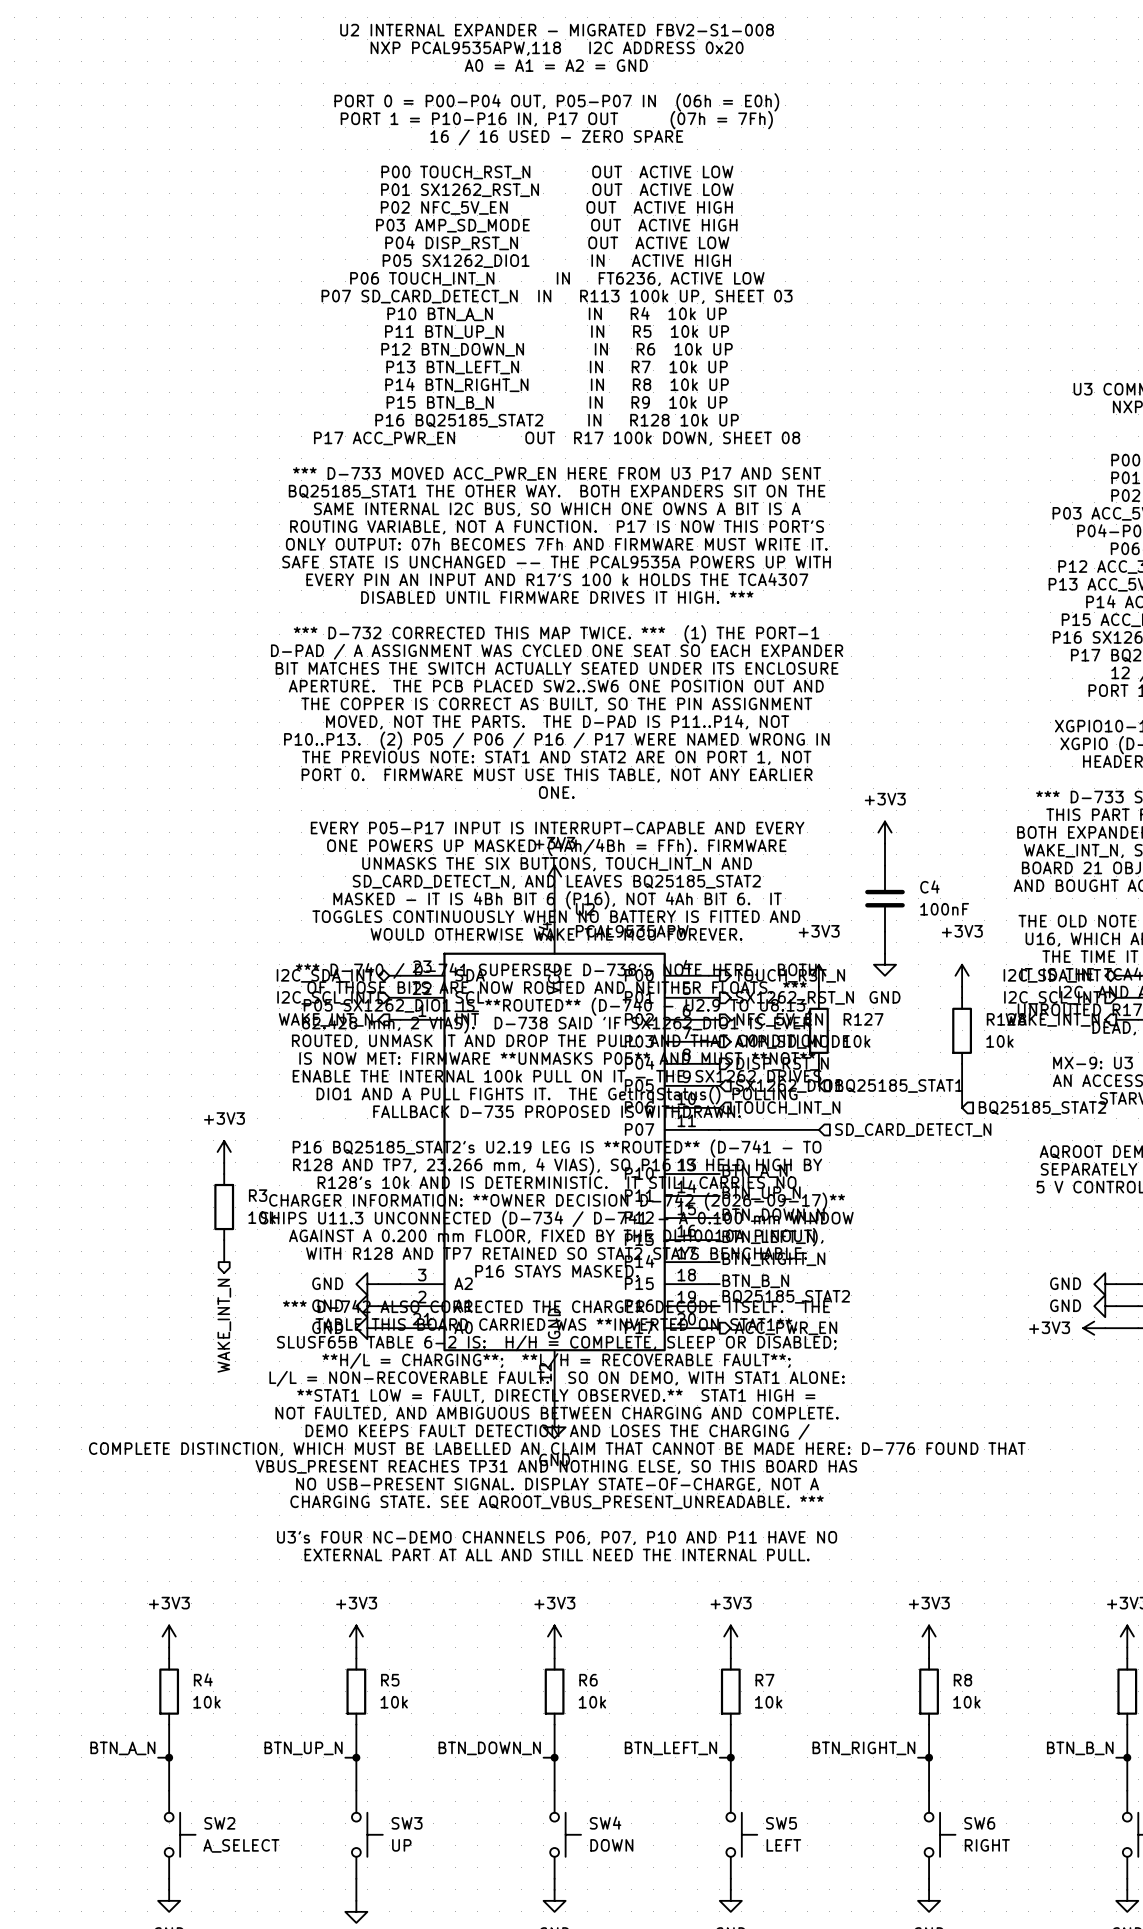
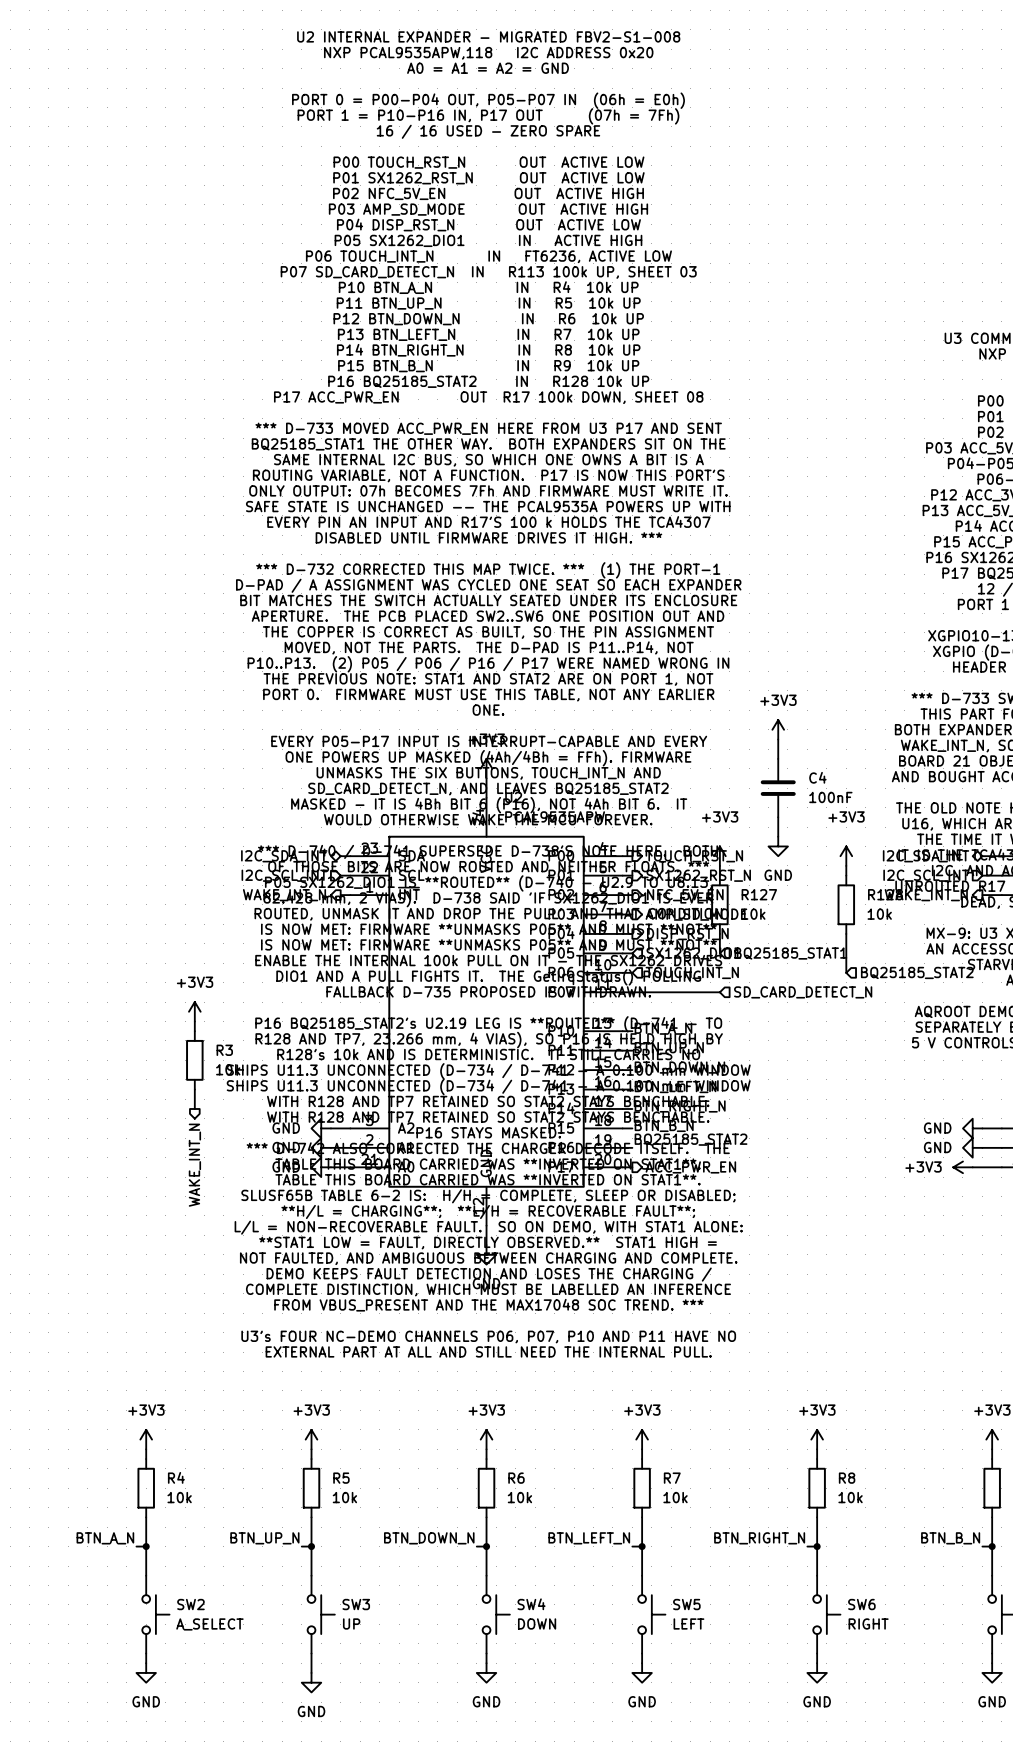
text: U2 INTERNAL EXPANDER - MIGRATED FBV2-S1-008 (557, 30) -> none
text: NXP PCAL9535APW,118 I2C ADDRESS 0x20 (557, 48) -> U2 INTERNAL EXPANDER - MIGRATED FBV2-S1-008 (488, 36)
text: A0 = A1 = A2 = GND (556, 65) -> NXP PCAL9535APW,118 I2C ADDRESS 0x20 (488, 53)
text: none -> A0 = A1 = A2 = GND (488, 68)
text: PORT 0 = P00-P04 OUT, P05-P07 IN (06h = E0h) (556, 102) -> none
text: PORT 1 = P10-P16 IN, P17 OUT (07h = 7Fh) (556, 120) -> PORT 0 = P00-P04 OUT, P05-P07 IN (06h = E0h) (488, 100)
text: 16 / 16 USED - ZERO SPARE (556, 137) -> PORT 1 = P10-P16 IN, P17 OUT (07h = 7Fh) (488, 116)
text: none -> 16 / 16 USED - ZERO SPARE (488, 131)
text: P00 TOUCH_RST_N OUT ACTIVE LOW (557, 172) -> none
text: P01 SX1262_RST_N OUT ACTIVE LOW (557, 190) -> P00 TOUCH_RST_N OUT ACTIVE LOW (488, 162)
text: P02 NFC_5V_EN OUT ACTIVE HIGH (556, 207) -> P01 SX1262_RST_N OUT ACTIVE LOW (488, 178)
text: P03 AMP_SD_MODE OUT ACTIVE HIGH (556, 225) -> P02 NFC_5V_EN OUT ACTIVE HIGH (488, 193)
text: P04 DISP_RST_N OUT ACTIVE LOW (557, 243) -> P03 AMP_SD_MODE OUT ACTIVE HIGH (488, 209)
text: P05 SX1262_DIO1 IN ACTIVE HIGH (556, 261) -> P04 DISP_RST_N OUT ACTIVE LOW (488, 225)
text: P06 TOUCH_INT_N IN FT6236, ACTIVE LOW (557, 279) -> P05 SX1262_DIO1 IN ACTIVE HIGH (488, 240)
text: P07 SD_CARD_DETECT_N IN R113 100k UP, SHEET 03 (557, 296) -> P06 TOUCH_INT_N IN FT6236, ACTIVE LOW (488, 256)
text: P10 BTN_A_N IN R4 10k UP (557, 314) -> P07 SD_CARD_DETECT_N IN R113 100k UP, SHEET 03 (488, 272)
text: P11 BTN_UP_N IN R5 10k UP (557, 332) -> P10 BTN_A_N IN R4 10k UP (488, 287)
text: P12 BTN_DOWN_N IN R6 10k UP (557, 349) -> P11 BTN_UP_N IN R5 10k UP (488, 303)
text: P13 BTN_LEFT_N IN R7 10k UP (557, 367) -> P12 BTN_DOWN_N IN R6 10k UP (488, 319)
text: P14 BTN_RIGHT_N IN R8 10k UP (557, 385) -> P13 BTN_LEFT_N IN R7 10k UP (488, 334)
text: P15 BTN_B_N IN R9 10k UP (557, 403) -> P14 BTN_RIGHT_N IN R8 10k UP (488, 350)
text: P16 BQ25185_STAT2 IN R128 10k UP (557, 420) -> P15 BTN_B_N IN R9 10k UP (488, 366)
text: P17 ACC_PWR_EN OUT R17 100k DOWN, SHEET 08 (557, 438) -> P16 BQ25185_STAT2 IN R128 10k UP (488, 381)
text: none -> P17 ACC_PWR_EN OUT R17 100k DOWN, SHEET 08 (488, 397)
text: *** D-733 MOVED ACC_PWR_EN HERE FROM U3 P17 AND SENT (557, 473) -> none
text: BQ25185_STAT1 THE OTHER WAY. BOTH EXPANDERS SIT ON THE (557, 491) -> *** D-733 MOVED ACC_PWR_EN HERE FROM U3 P17 AND SENT (488, 428)
text: SAME INTERNAL I2C BUS, SO WHICH ONE OWNS A BIT IS A (557, 509) -> BQ25185_STAT1 THE OTHER WAY. BOTH EXPANDERS SIT ON THE (488, 444)
text: ROUTING VARIABLE, NOT A FUNCTION. P17 IS NOW THIS PORT'S (557, 527) -> SAME INTERNAL I2C BUS, SO WHICH ONE OWNS A BIT IS A (488, 460)
text: ONLY OUTPUT: 07h BECOMES 7Fh AND FIRMWARE MUST WRITE IT. (556, 544) -> ROUTING VARIABLE, NOT A FUNCTION. P17 IS NOW THIS PORT'S (488, 475)
text: SAFE STATE IS UNCHANGED -- THE PCAL9535A POWERS UP WITH (556, 562) -> ONLY OUTPUT: 07h BECOMES 7Fh AND FIRMWARE MUST WRITE IT. (488, 490)
text: EVERY PIN AN INPUT AND R17'S 100 k HOLDS THE TCA4307 (557, 579) -> SAFE STATE IS UNCHANGED -- THE PCAL9535A POWERS UP WITH (488, 506)
text: DISABLED UNTIL FIRMWARE DRIVES IT HIGH. *** (557, 597) -> EVERY PIN AN INPUT AND R17'S 100 k HOLDS THE TCA4307 (488, 522)
text: none -> DISABLED UNTIL FIRMWARE DRIVES IT HIGH. *** (488, 537)
text: *** D-732 CORRECTED THIS MAP TWICE. *** (1) THE PORT-1 (556, 634) -> none
text: D-PAD / A ASSIGNMENT WAS CYCLED ONE SEAT SO EACH EXPANDER (557, 651) -> *** D-732 CORRECTED THIS MAP TWICE. *** (1) THE PORT-1 (488, 570)
text: BIT MATCHES THE SWITCH ACTUALLY SEATED UNDER ITS ENCLOSURE (557, 668) -> D-PAD / A ASSIGNMENT WAS CYCLED ONE SEAT SO EACH EXPANDER (488, 585)
text: APERTURE. THE PCB PLACED SW2..SW6 ONE POSITION OUT AND (556, 686) -> BIT MATCHES THE SWITCH ACTUALLY SEATED UNDER ITS ENCLOSURE (488, 600)
text: THE COPPER IS CORRECT AS BUILT, SO THE PIN ASSIGNMENT (556, 704) -> APERTURE. THE PCB PLACED SW2..SW6 ONE POSITION OUT AND (488, 616)
text: MOVED, NOT THE PARTS. THE D-PAD IS P11..P14, NOT (557, 722) -> THE COPPER IS CORRECT AS BUILT, SO THE PIN ASSIGNMENT (488, 632)
text: P10..P13. (2) P05 / P06 / P16 / P17 WERE NAMED WRONG IN (556, 740) -> MOVED, NOT THE PARTS. THE D-PAD IS P11..P14, NOT (489, 647)
text: THE PREVIOUS NOTE: STAT1 AND STAT2 ARE ON PORT 1, NOT (556, 757) -> P10..P13. (2) P05 / P06 / P16 / P17 WERE NAMED WRONG IN (488, 664)
text: PORT 0. FIRMWARE MUST USE THIS TABLE, NOT ANY EARLIER (557, 775) -> THE PREVIOUS NOTE: STAT1 AND STAT2 ARE ON PORT 1, NOT (488, 679)
text: ONE. (556, 792) -> PORT 0. FIRMWARE MUST USE THIS TABLE, NOT ANY EARLIER (488, 695)
text: none -> ONE. (488, 710)
text: EVERY P05-P17 INPUT IS INTERRUPT-CAPABLE AND EVERY (557, 828) -> none
text: ONE POWERS UP MASKED (4Ah/4Bh = FFh). FIRMWARE (556, 847) -> EVERY P05-P17 INPUT IS INTERRUPT-CAPABLE AND EVERY (489, 741)
text: UNMASKS THE SIX BUTTONS, TOUCH_INT_N AND (557, 864) -> ONE POWERS UP MASKED (4Ah/4Bh = FFh). FIRMWARE (488, 758)
text: SD_CARD_DETECT_N, AND LEAVES BQ25185_STAT2 (556, 882) -> UNMASKS THE SIX BUTTONS, TOUCH_INT_N AND (488, 773)
text: MASKED - IT IS 4Bh BIT 6 (P16), NOT 4Ah BIT 6. IT (557, 900) -> SD_CARD_DETECT_N, AND LEAVES BQ25185_STAT2 (488, 789)
text: TOGGLES CONTINUOUSLY WHEN NO BATTERY IS FITTED AND (556, 916) -> MASKED - IT IS 4Bh BIT 6 (P16), NOT 4Ah BIT 6. IT (489, 805)
text: ENABLE THE INTERNAL 100k PULL ON IT - THE SX1262 DRIVES (557, 1076) -> IS NOW MET: FIRMWARE **UNMASKS P05** AND MUST **NOT** (488, 944)
text: DIO1 AND A PULL FIGHTS IT. THE GetIrqStatus() POLLING (557, 1095) -> ENABLE THE INTERNAL 100k PULL ON IT - THE SX1262 DRIVES (488, 960)
text: FALLBACK D-735 PROPOSED IS WITHDRAWN. (557, 1111) -> DIO1 AND A PULL FIGHTS IT. THE GetIrqStatus() POLLING (488, 977)
text: none -> FALLBACK D-735 PROPOSED IS WITHDRAWN. (488, 991)
text: P16 BQ25185_STAT2's U2.19 LEG IS **ROUTED** (D-741 - TO (557, 1148) -> none
text: R128 AND TP7, 23.266 mm, 4 VIAS), SO P16 IS HELD HIGH BY (557, 1166) -> P16 BQ25185_STAT2's U2.19 LEG IS **ROUTED** (D-741 - TO (488, 1024)
text: R128's 10k AND IS DETERMINISTIC. IT STILL CARRIES NO (557, 1182) -> R128 AND TP7, 23.266 mm, 4 VIAS), SO P16 IS HELD HIGH BY (489, 1040)
text: CHARGER INFORMATION: **OWNER DECISION D-742 (2026-09-17)** (557, 1201) -> R128's 10k AND IS DETERMINISTIC. IT STILL CARRIES NO (488, 1054)
text: AGAINST A 0.200 mm FLOOR, FIXED BY THE DLH0010A PINOUT), (556, 1237) -> SHIPS U11.3 UNCONNECTED (D-734 / D-741 - A 0.100 mm WINDOW (488, 1086)
text: P16 STAYS MASKED. (557, 1271) -> WITH R128 AND TP7 RETAINED SO STAT2 STAYS BENCHABLE. (488, 1117)
text: none -> P16 STAYS MASKED. (488, 1132)
text: SLUSF65B TABLE 6-2 IS: H/H = COMPLETE, SLEEP OR DISABLED; (556, 1343) -> TABLE THIS BOARD CARRIED WAS **INVERTED ON STAT1**. (488, 1179)
text: **H/L = CHARGING**; **L/H = RECOVERABLE FAULT**; (556, 1361) -> SLUSF65B TABLE 6-2 IS: H/H = COMPLETE, SLEEP OR DISABLED; (488, 1196)
text: L/L = NON-RECOVERABLE FAULT. SO ON DEMO, WITH STAT1 ALONE: (557, 1378) -> **H/L = CHARGING**; **L/H = RECOVERABLE FAULT**; (488, 1211)
text: **STAT1 LOW = FAULT, DIRECTLY OBSERVED.** STAT1 HIGH = (556, 1396) -> L/L = NON-RECOVERABLE FAULT. SO ON DEMO, WITH STAT1 ALONE: (488, 1227)
text: NOT FAULTED, AND AMBIGUOUS BETWEEN CHARGING AND COMPLETE. (557, 1413) -> **STAT1 LOW = FAULT, DIRECTLY OBSERVED.** STAT1 HIGH = (488, 1243)
text: DEMO KEEPS FAULT DETECTION AND LOSES THE CHARGING / (557, 1431) -> NOT FAULTED, AND AMBIGUOUS BETWEEN CHARGING AND COMPLETE. (488, 1258)
text: COMPLETE DISTINCTION, WHICH MUST BE LABELLED AN CLAIM THAT CANNOT BE MADE HERE: D-776 FOUND THAT (557, 1449) -> DEMO KEEPS FAULT DETECTION AND LOSES THE CHARGING / (489, 1274)
text: VBUS_PRESENT REACHES TP31 AND NOTHING ELSE, SO THIS BOARD HAS (556, 1467) -> COMPLETE DISTINCTION, WHICH MUST BE LABELLED AN INFERENCE (488, 1290)
text: NO USB-PRESENT SIGNAL. DISPLAY STATE-OF-CHARGE, NOT A (557, 1484) -> FROM VBUS_PRESENT AND THE MAX17048 SOC TREND. *** (488, 1305)
text: CHARGING STATE. SEE AQROOT_VBUS_PRESENT_UNREADABLE. *** (557, 1502) -> none
text: none -> U3's FOUR NC-DEMO CHANNELS P06, P07, P10 AND P11 HAVE NO (488, 1336)
text: U3's FOUR NC-DEMO CHANNELS P06, P07, P10 AND P11 HAVE NO (557, 1538) -> EXTERNAL PART AT ALL AND STILL NEED THE INTERNAL PULL. (488, 1351)
text: EXTERNAL PART AT ALL AND STILL NEED THE INTERNAL PULL. (557, 1555) -> none

